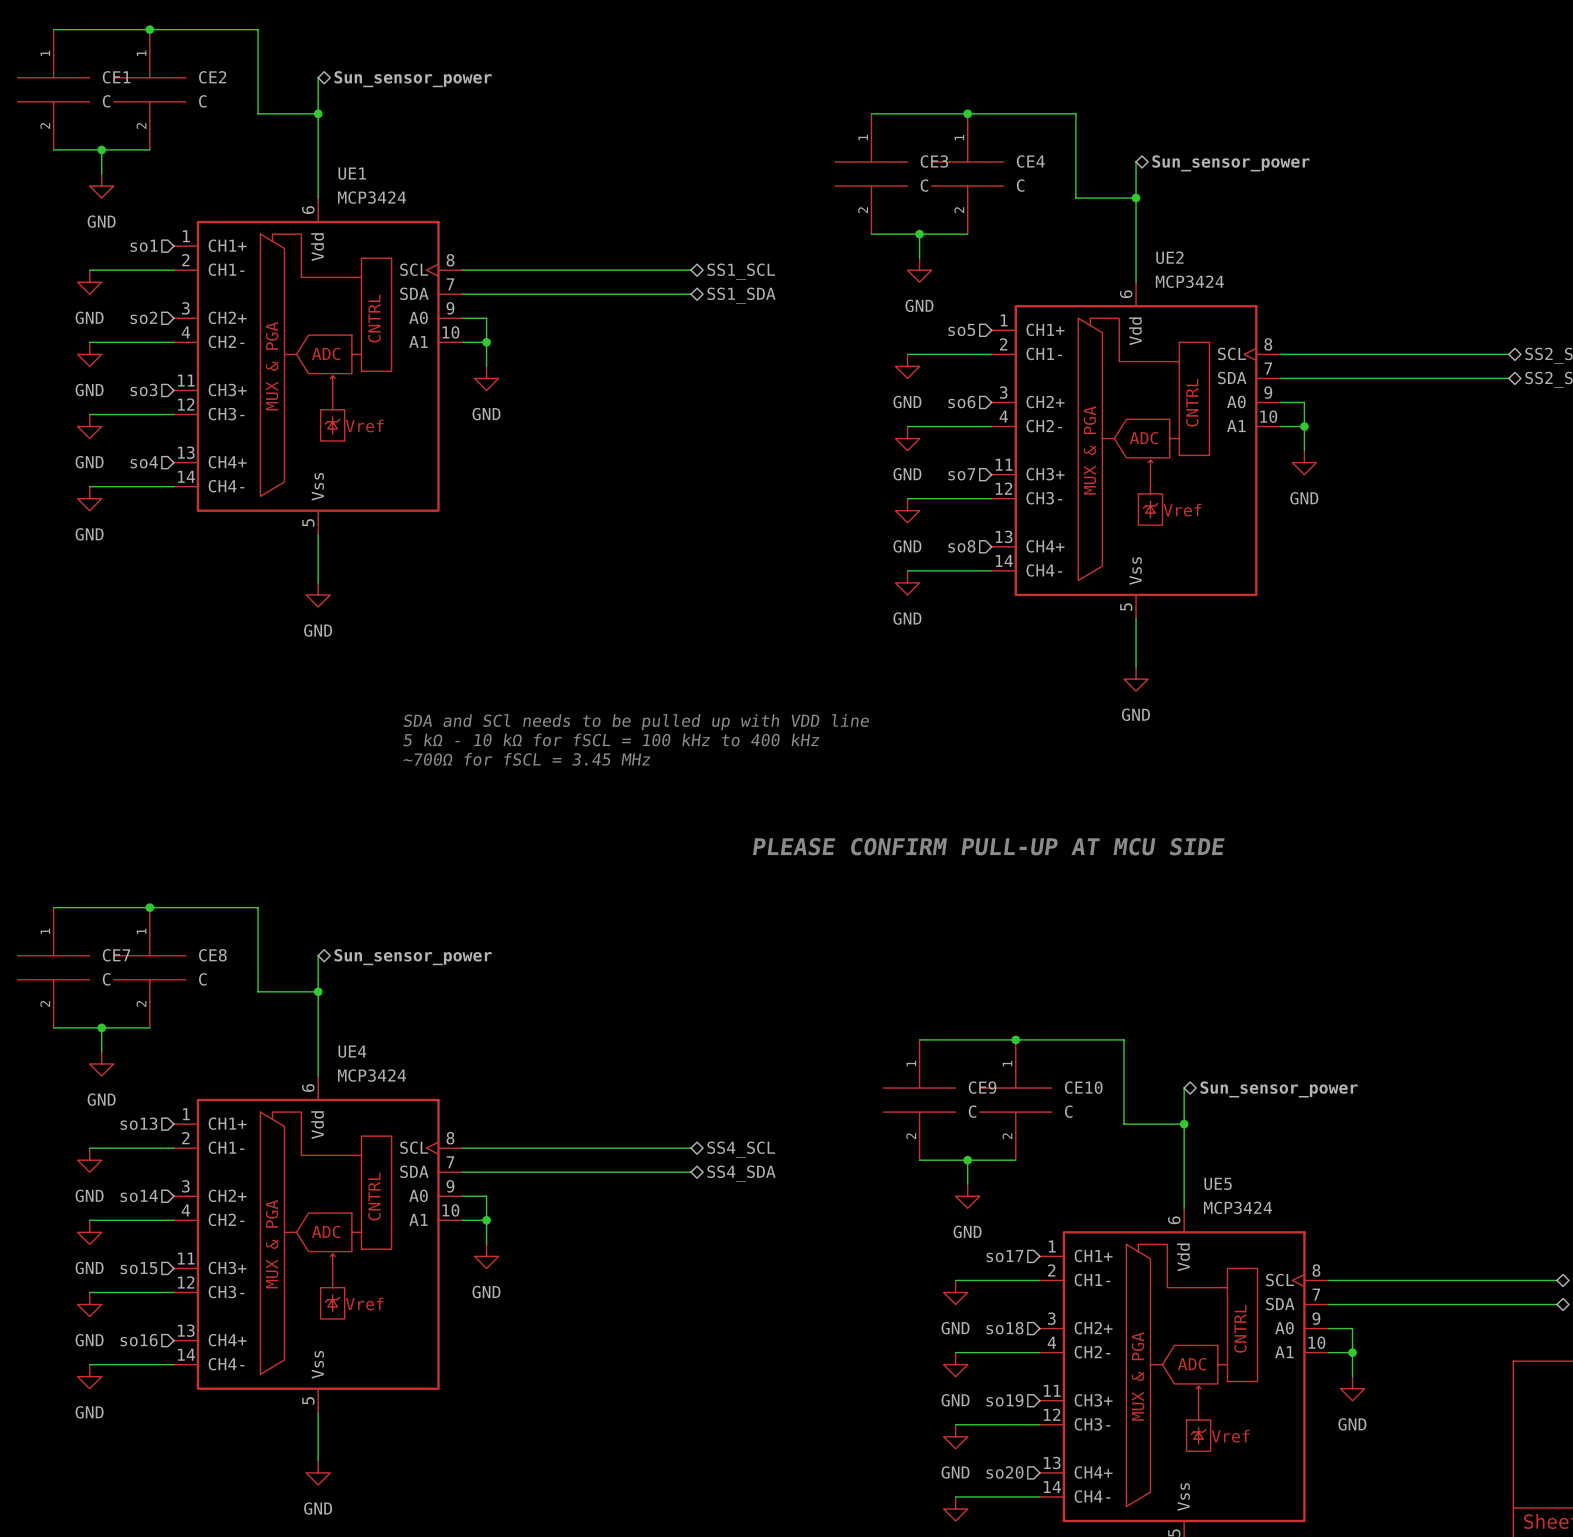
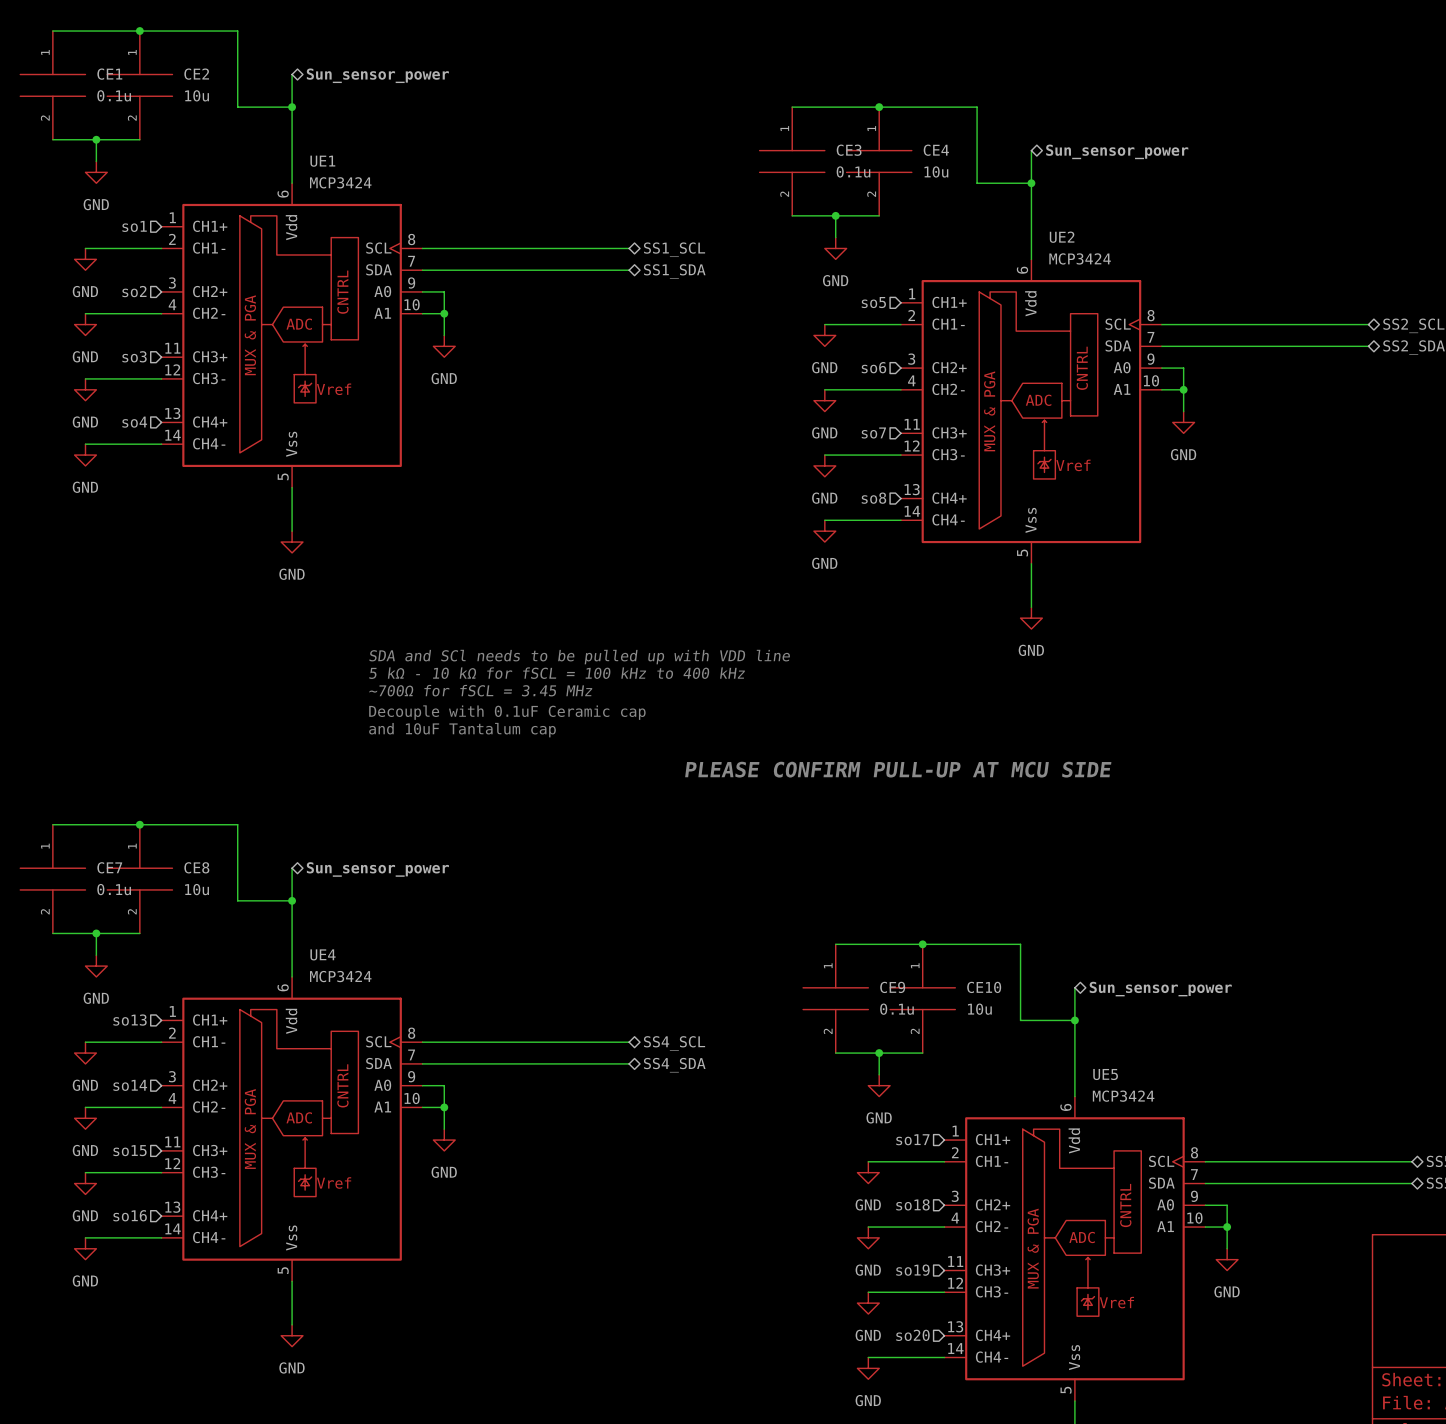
CE1 value: C (106, 101) -> 0.1u (114, 95)
CE2 value: C (202, 101) -> 10u (197, 95)
CE3 value: C (924, 185) -> 0.1u (853, 171)
CE4 value: C (1020, 185) -> 10u (936, 171)
text: none -> Decouple with 0.1uF Ceramic cap (507, 712)
text: none -> and 10uF Tantalum cap (462, 730)
CE7 value: C (106, 979) -> 0.1u (114, 889)
CE8 value: C (202, 979) -> 10u (197, 889)
CE9 value: C (972, 1111) -> 0.1u (896, 1009)
CE10 value: C (1068, 1111) -> 10u (979, 1009)

